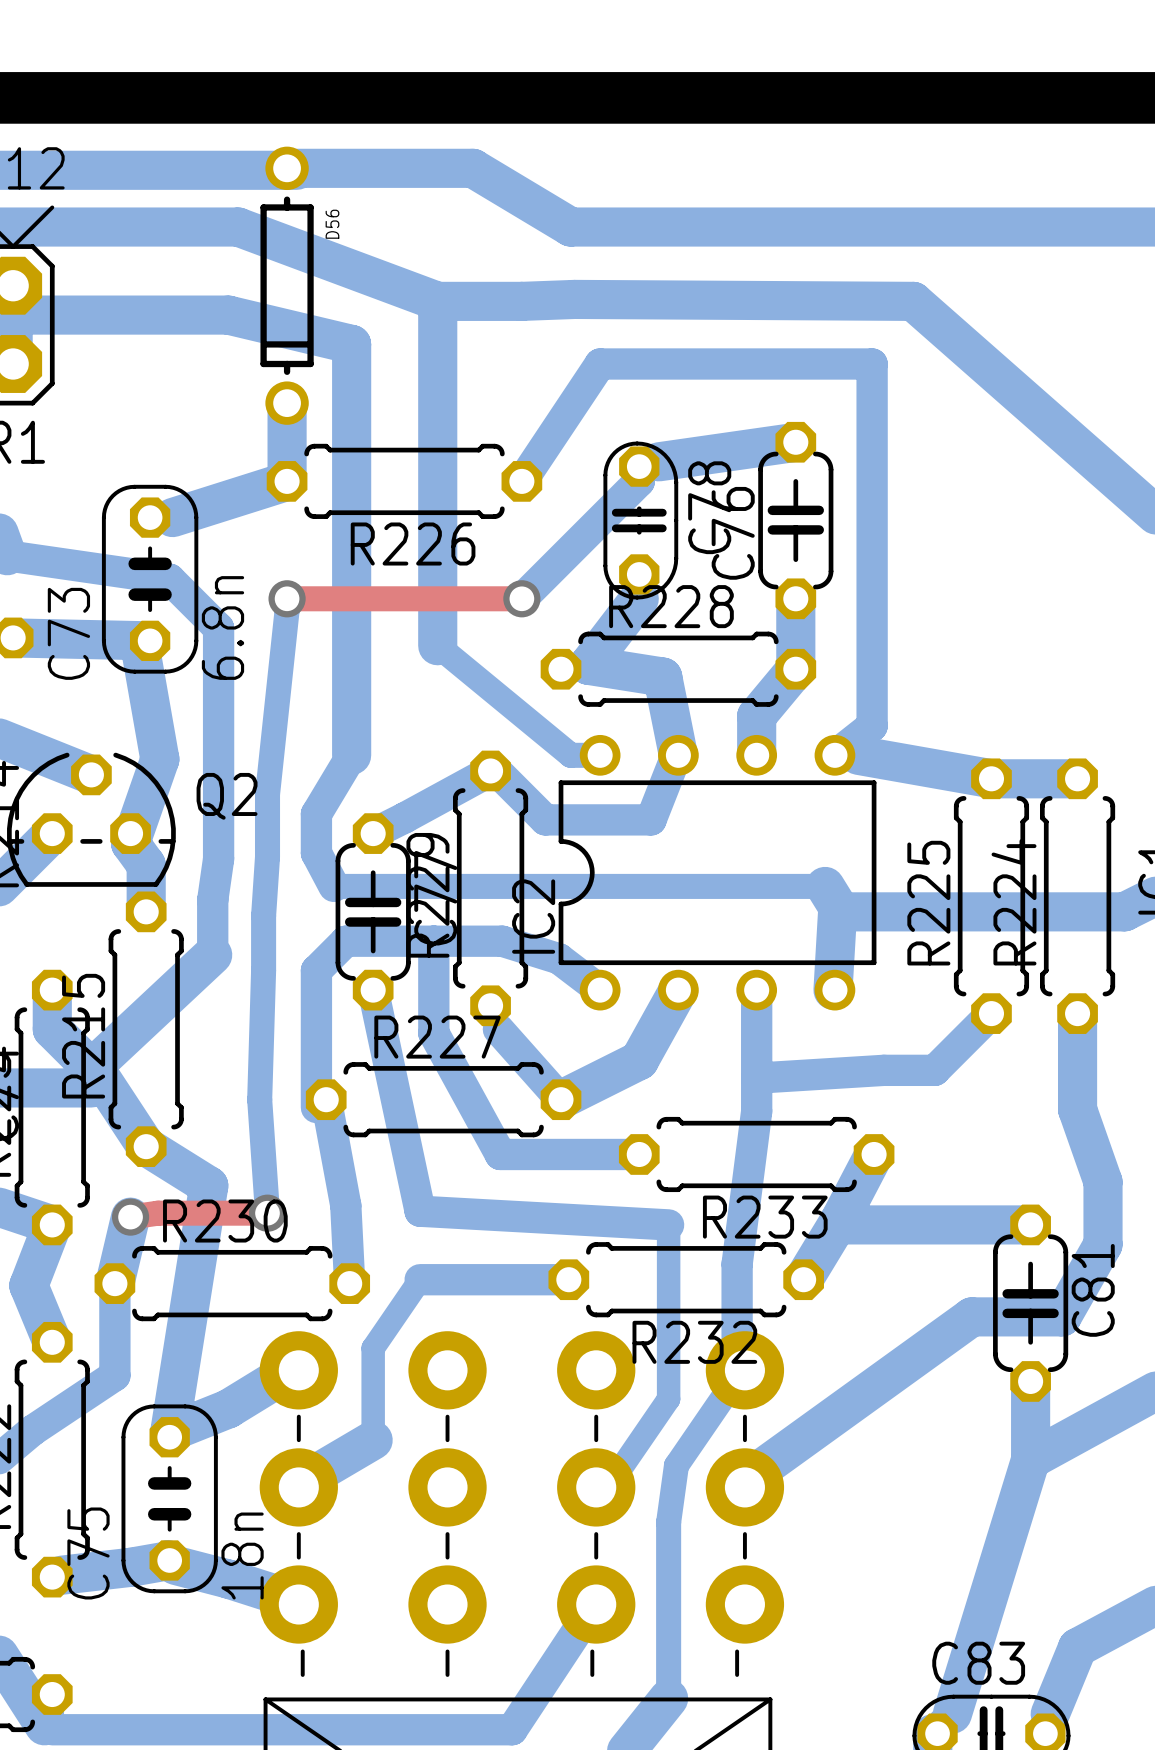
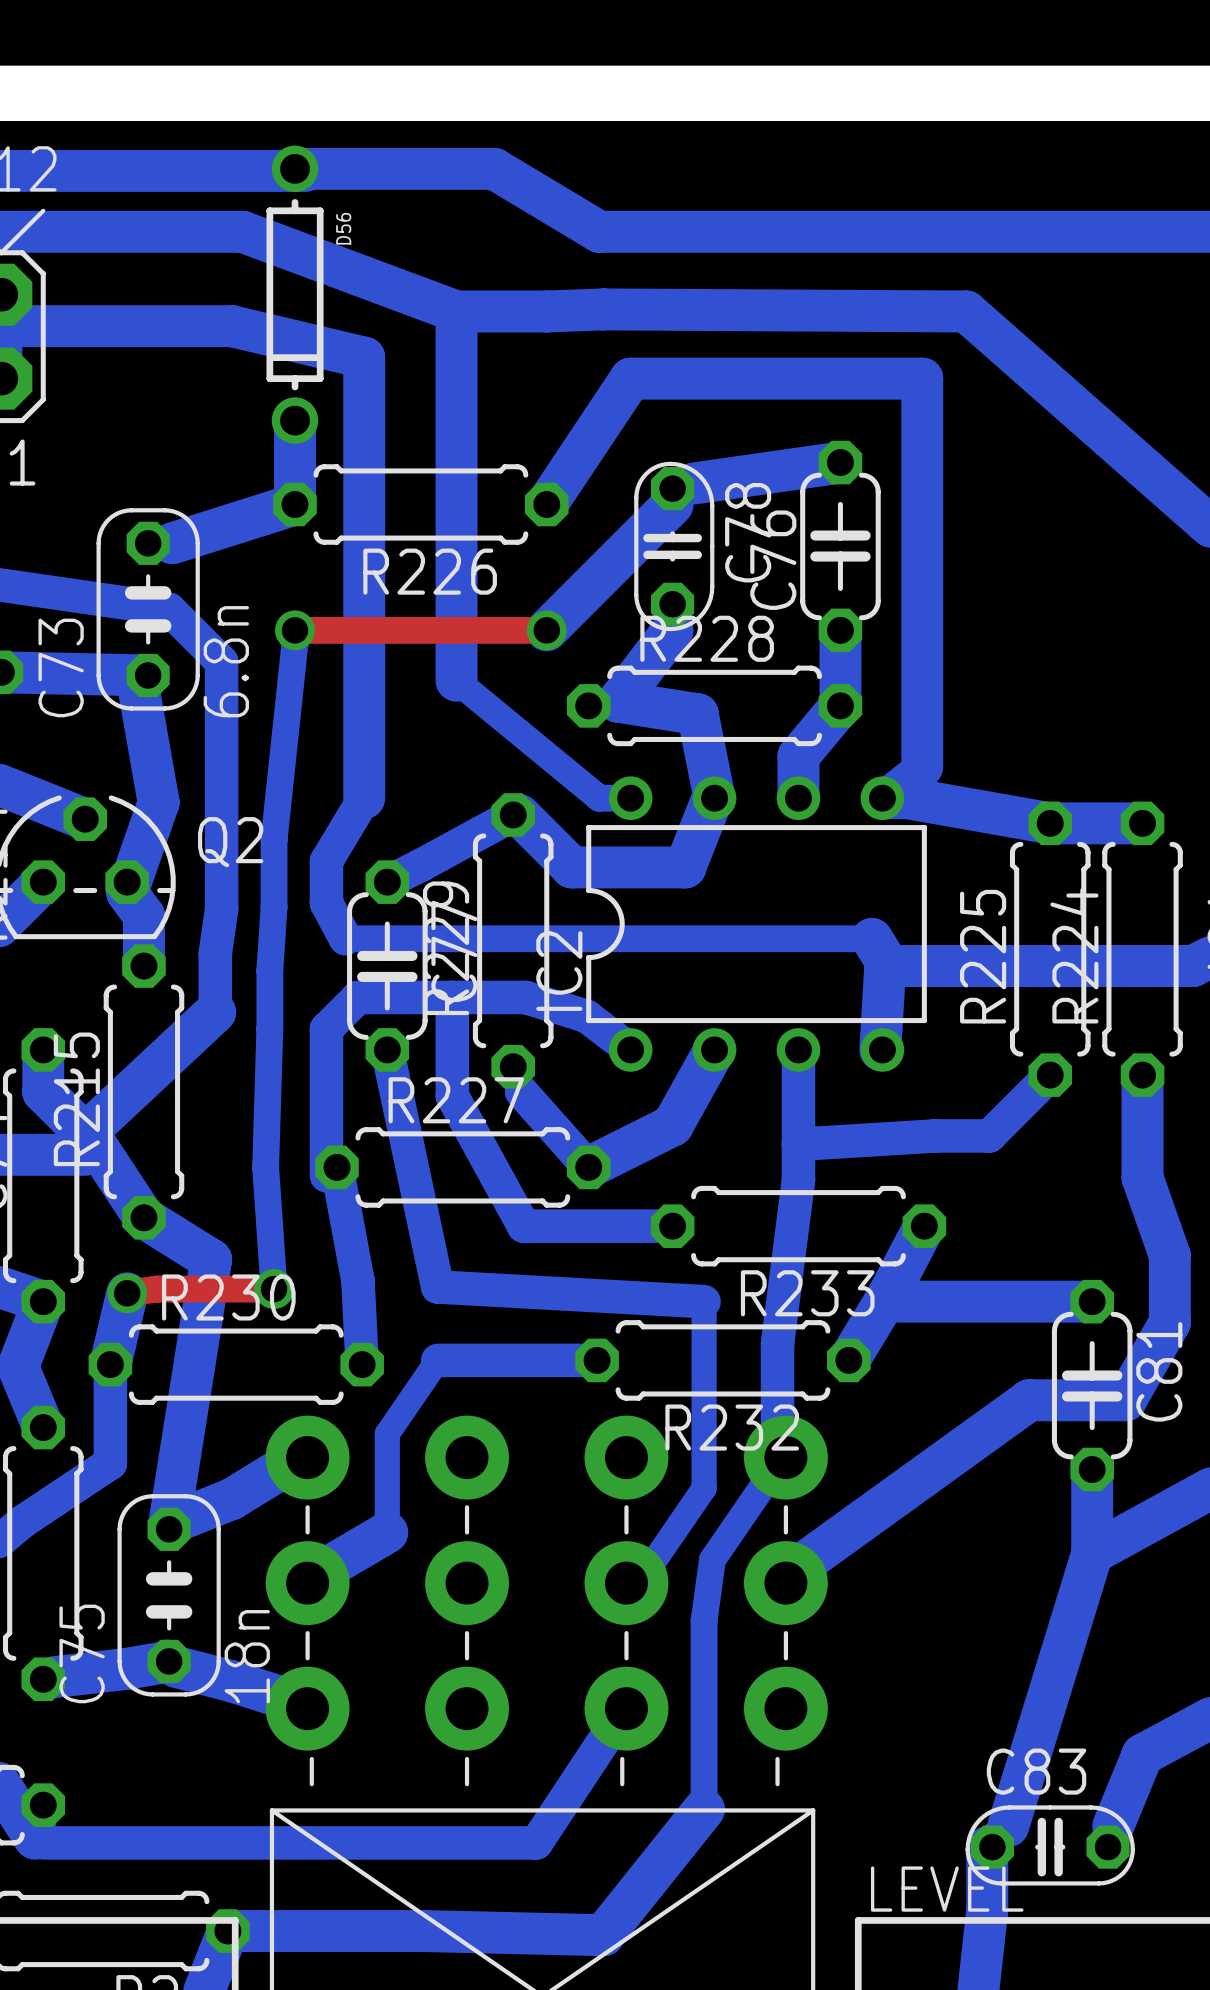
bottom track width: thin (521, 481) (600, 363) (872, 363) (872, 725) -> thick (546, 504) (630, 378) (922, 378) (922, 766)
bottom track width: thin (639, 481) (521, 598) -> thick (672, 504) (546, 630)
bottom track width: thin (676, 755) (651, 819) (545, 819) (496, 770) -> thick (712, 798) (685, 867) (571, 867) (519, 814)

